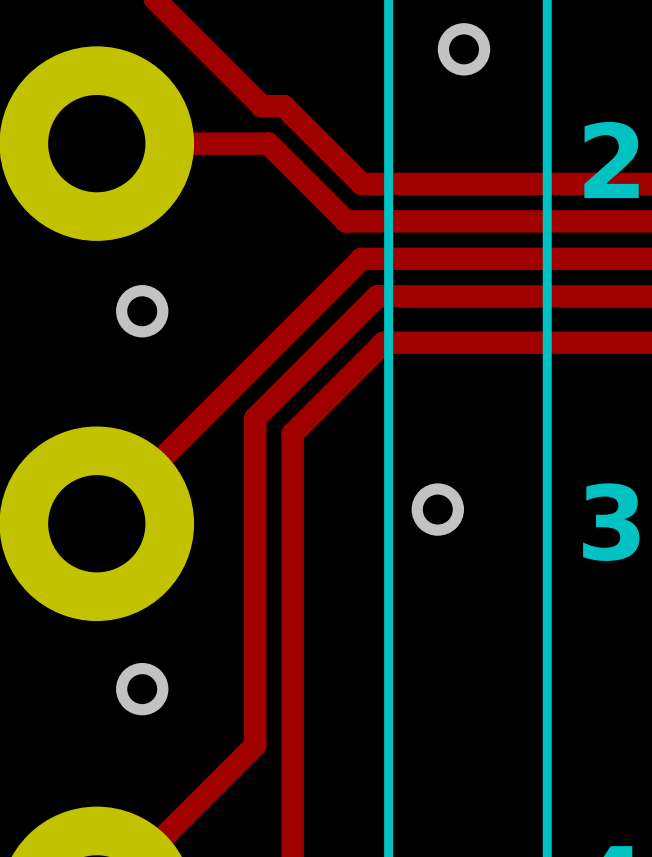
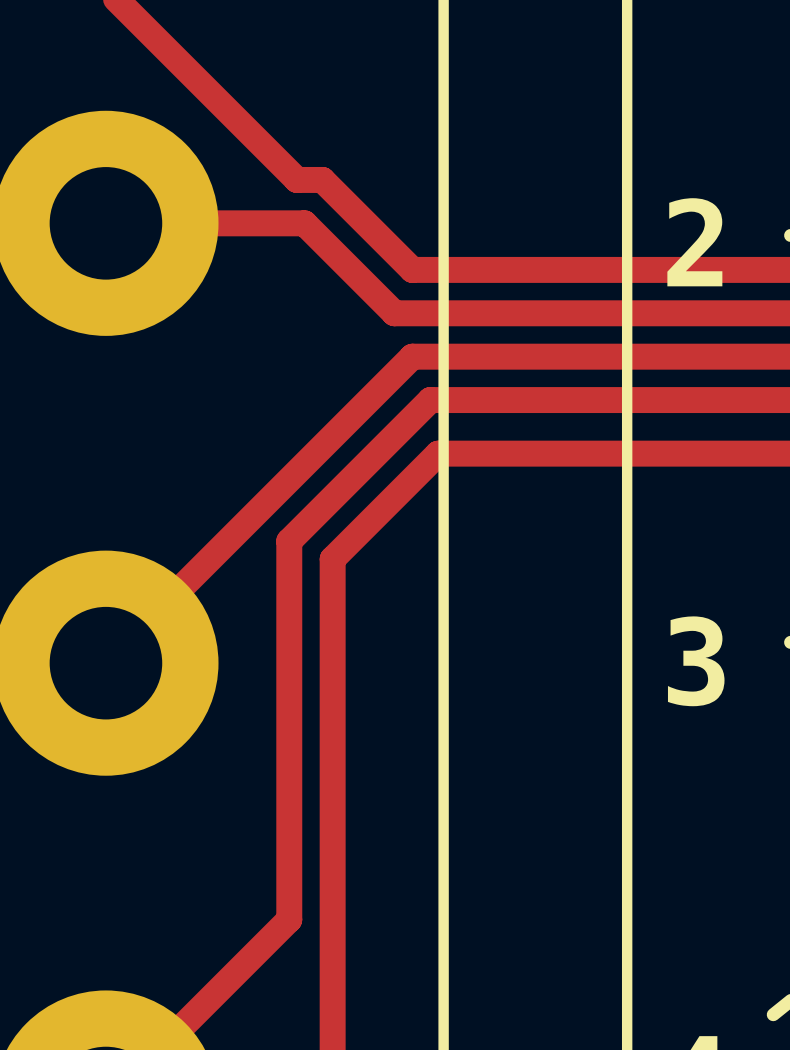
via: (464, 49) -> none
via: (142, 311) -> none
via: (437, 509) -> none
via: (142, 689) -> none

